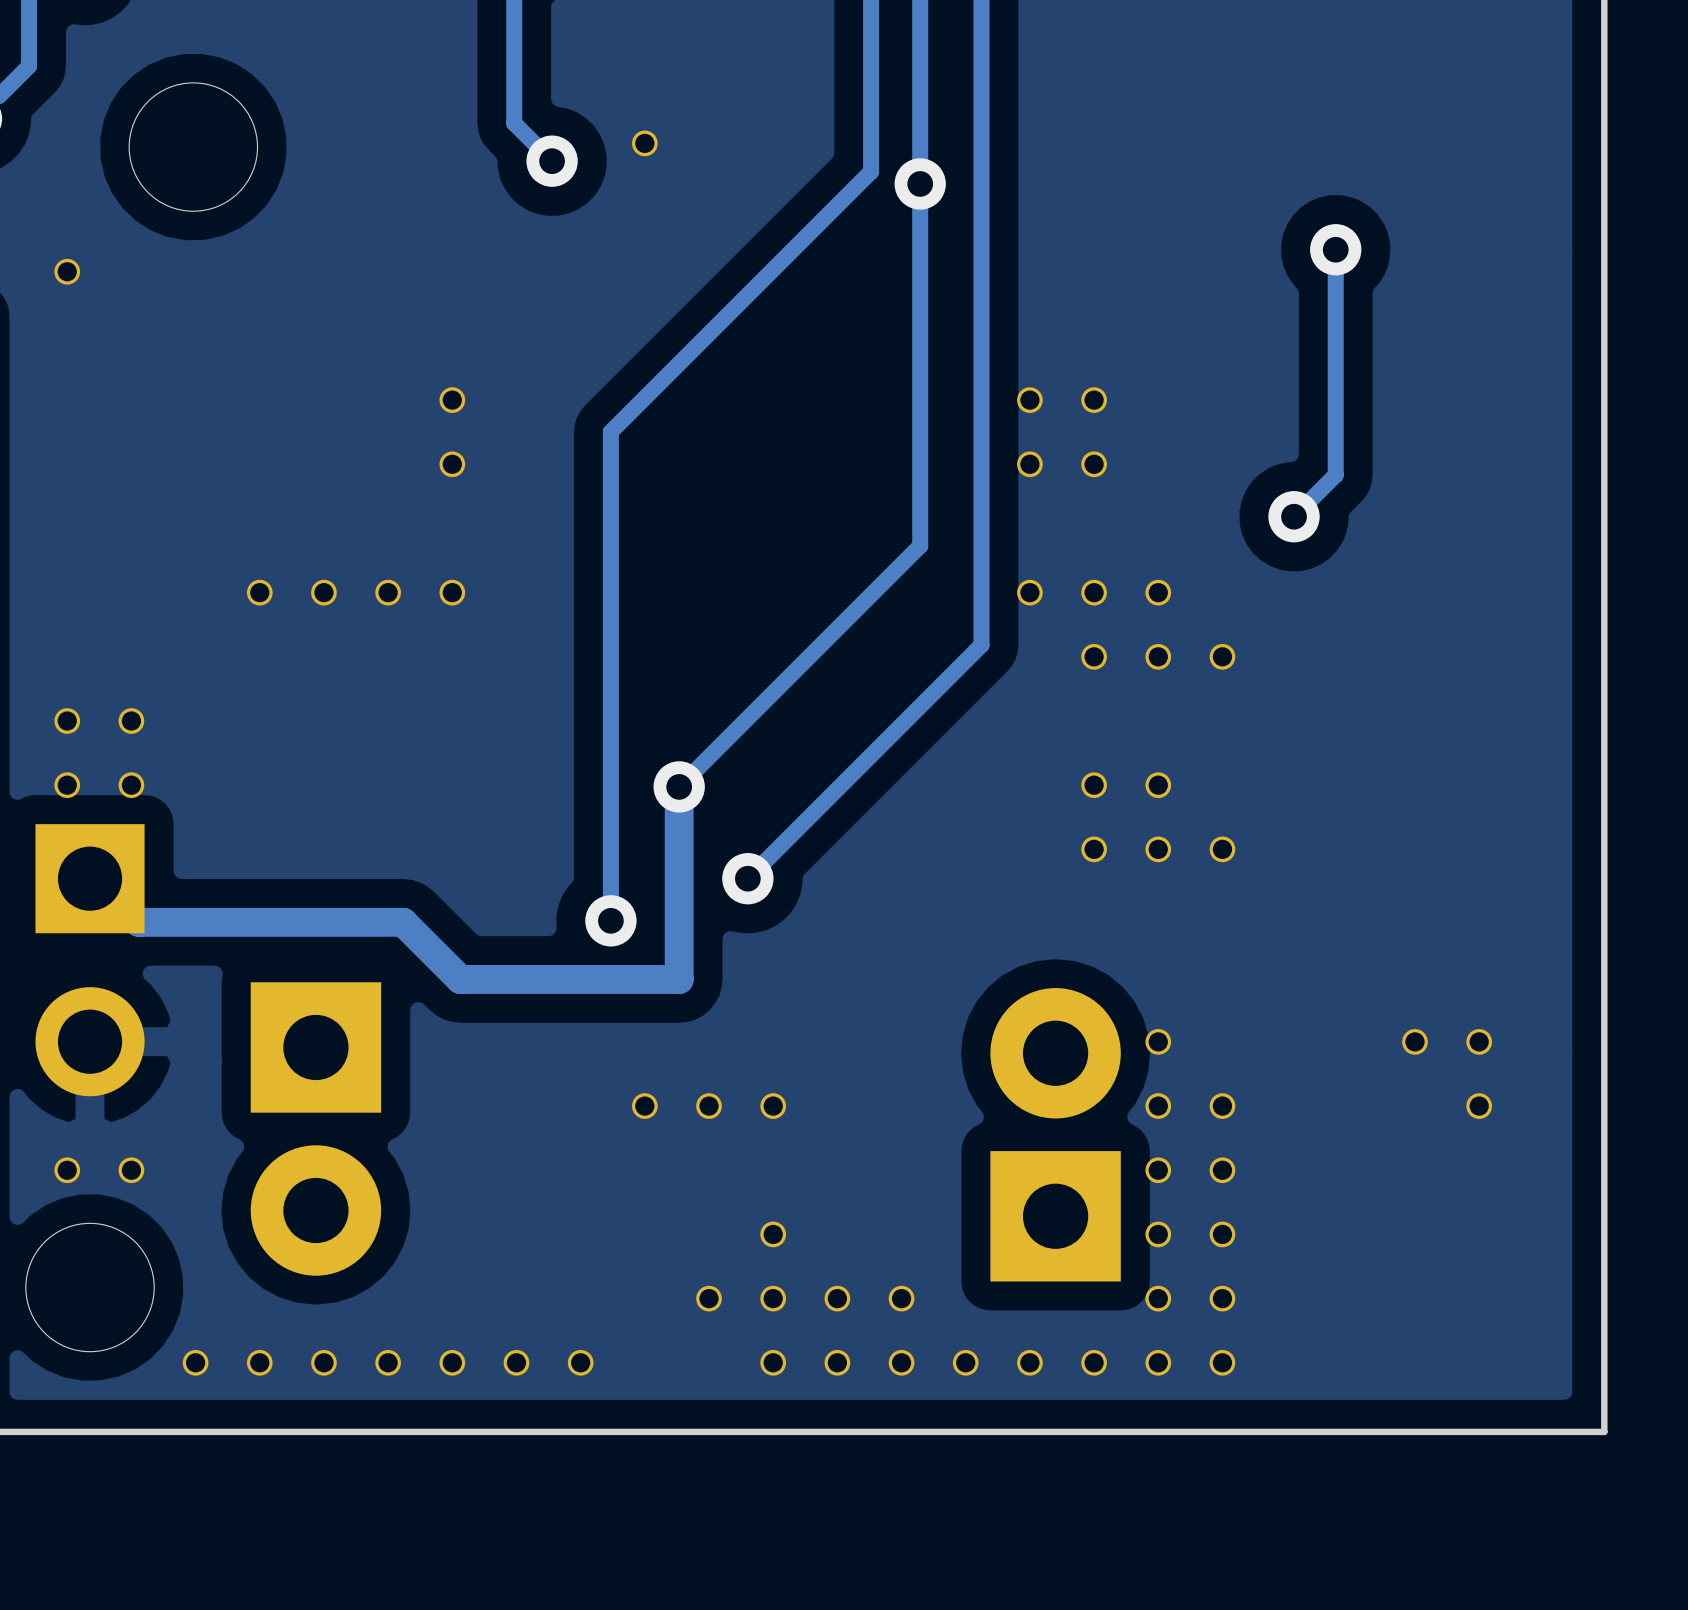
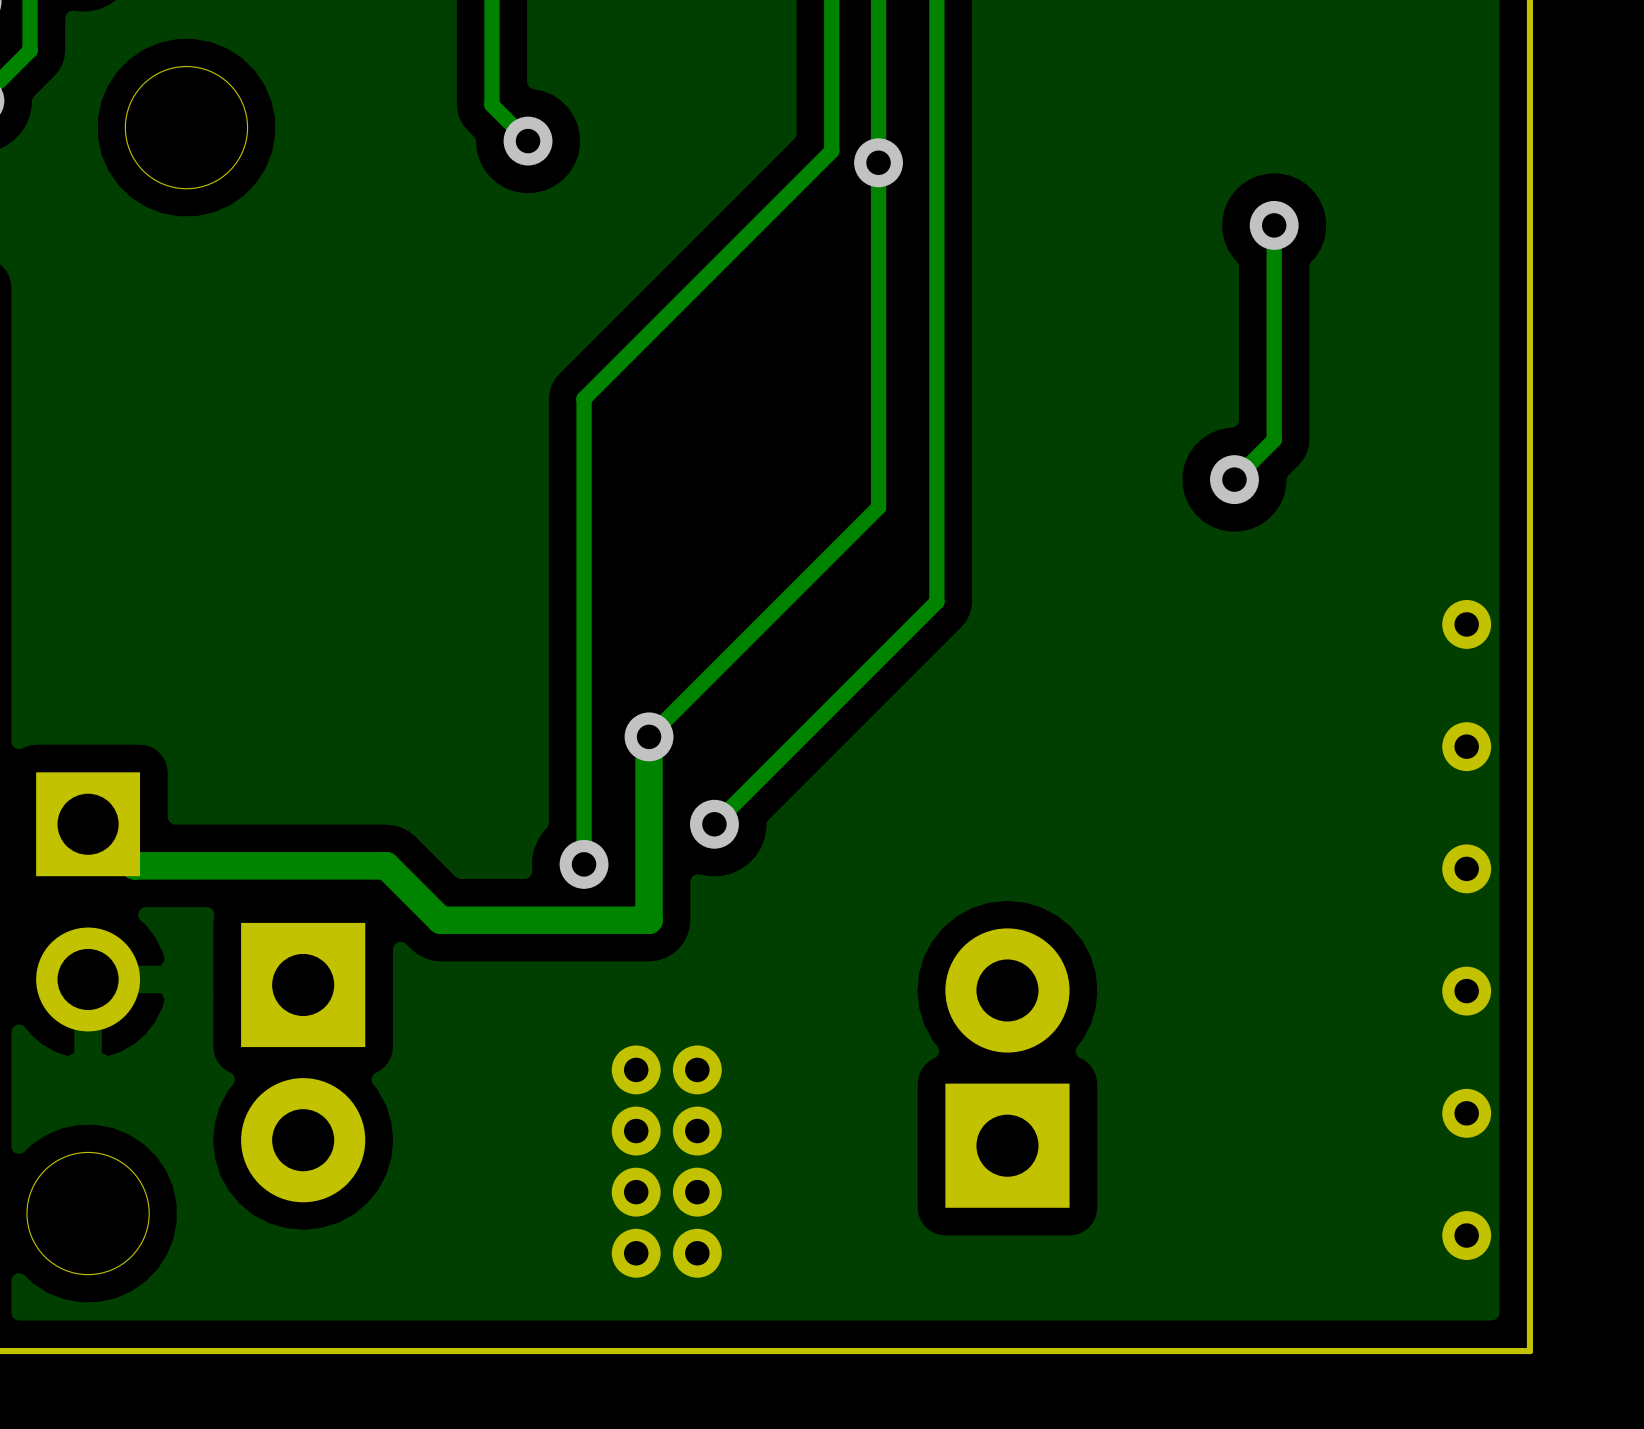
part: (644, 143) -> none
part: (67, 271) -> none
part: (452, 400) -> none
part: (1029, 400) -> none
part: (1094, 400) -> none
part: (452, 464) -> none
part: (1029, 464) -> none
part: (1094, 464) -> none
part: (259, 592) -> none
part: (323, 592) -> none
part: (388, 592) -> none
part: (452, 592) -> none
part: (1029, 592) -> none
part: (1094, 592) -> none
part: (1158, 592) -> none
part: (1094, 656) -> none
part: (1158, 656) -> none
part: (1222, 656) -> none
part: none -> (1466, 624)
part: (67, 721) -> none
part: (131, 721) -> none
part: (67, 785) -> none
part: (131, 785) -> none
part: (1094, 785) -> none
part: (1158, 785) -> none
part: none -> (1466, 746)
part: (1094, 849) -> none
part: (1158, 849) -> none
part: (1222, 849) -> none
part: none -> (1466, 868)
part: (1158, 1041) -> none
part: (1415, 1041) -> none
part: (1479, 1041) -> none
part: none -> (1466, 991)
part: (644, 1106) -> none
part: (709, 1106) -> none
part: (773, 1106) -> none
part: (1158, 1106) -> none
part: (1222, 1106) -> none
part: (1479, 1106) -> none
part: none -> (636, 1069)
part: none -> (697, 1069)
part: (67, 1170) -> none
part: (131, 1170) -> none
part: (1158, 1170) -> none
part: (1222, 1170) -> none
part: none -> (1466, 1113)
part: none -> (636, 1131)
part: none -> (697, 1131)
part: (773, 1234) -> none
part: (1158, 1234) -> none
part: (1222, 1234) -> none
part: none -> (636, 1192)
part: none -> (697, 1192)
part: (709, 1298) -> none
part: (773, 1298) -> none
part: (837, 1298) -> none
part: (901, 1298) -> none
part: (1158, 1298) -> none
part: (1222, 1298) -> none
part: none -> (1466, 1235)
part: none -> (636, 1253)
part: none -> (697, 1253)
part: (195, 1362) -> none
part: (259, 1362) -> none
part: (323, 1362) -> none
part: (388, 1362) -> none
part: (452, 1362) -> none
part: (516, 1362) -> none
part: (580, 1362) -> none
part: (773, 1362) -> none
part: (837, 1362) -> none
part: (901, 1362) -> none
part: (965, 1362) -> none
part: (1029, 1362) -> none
part: (1094, 1362) -> none
part: (1158, 1362) -> none
part: (1222, 1362) -> none

